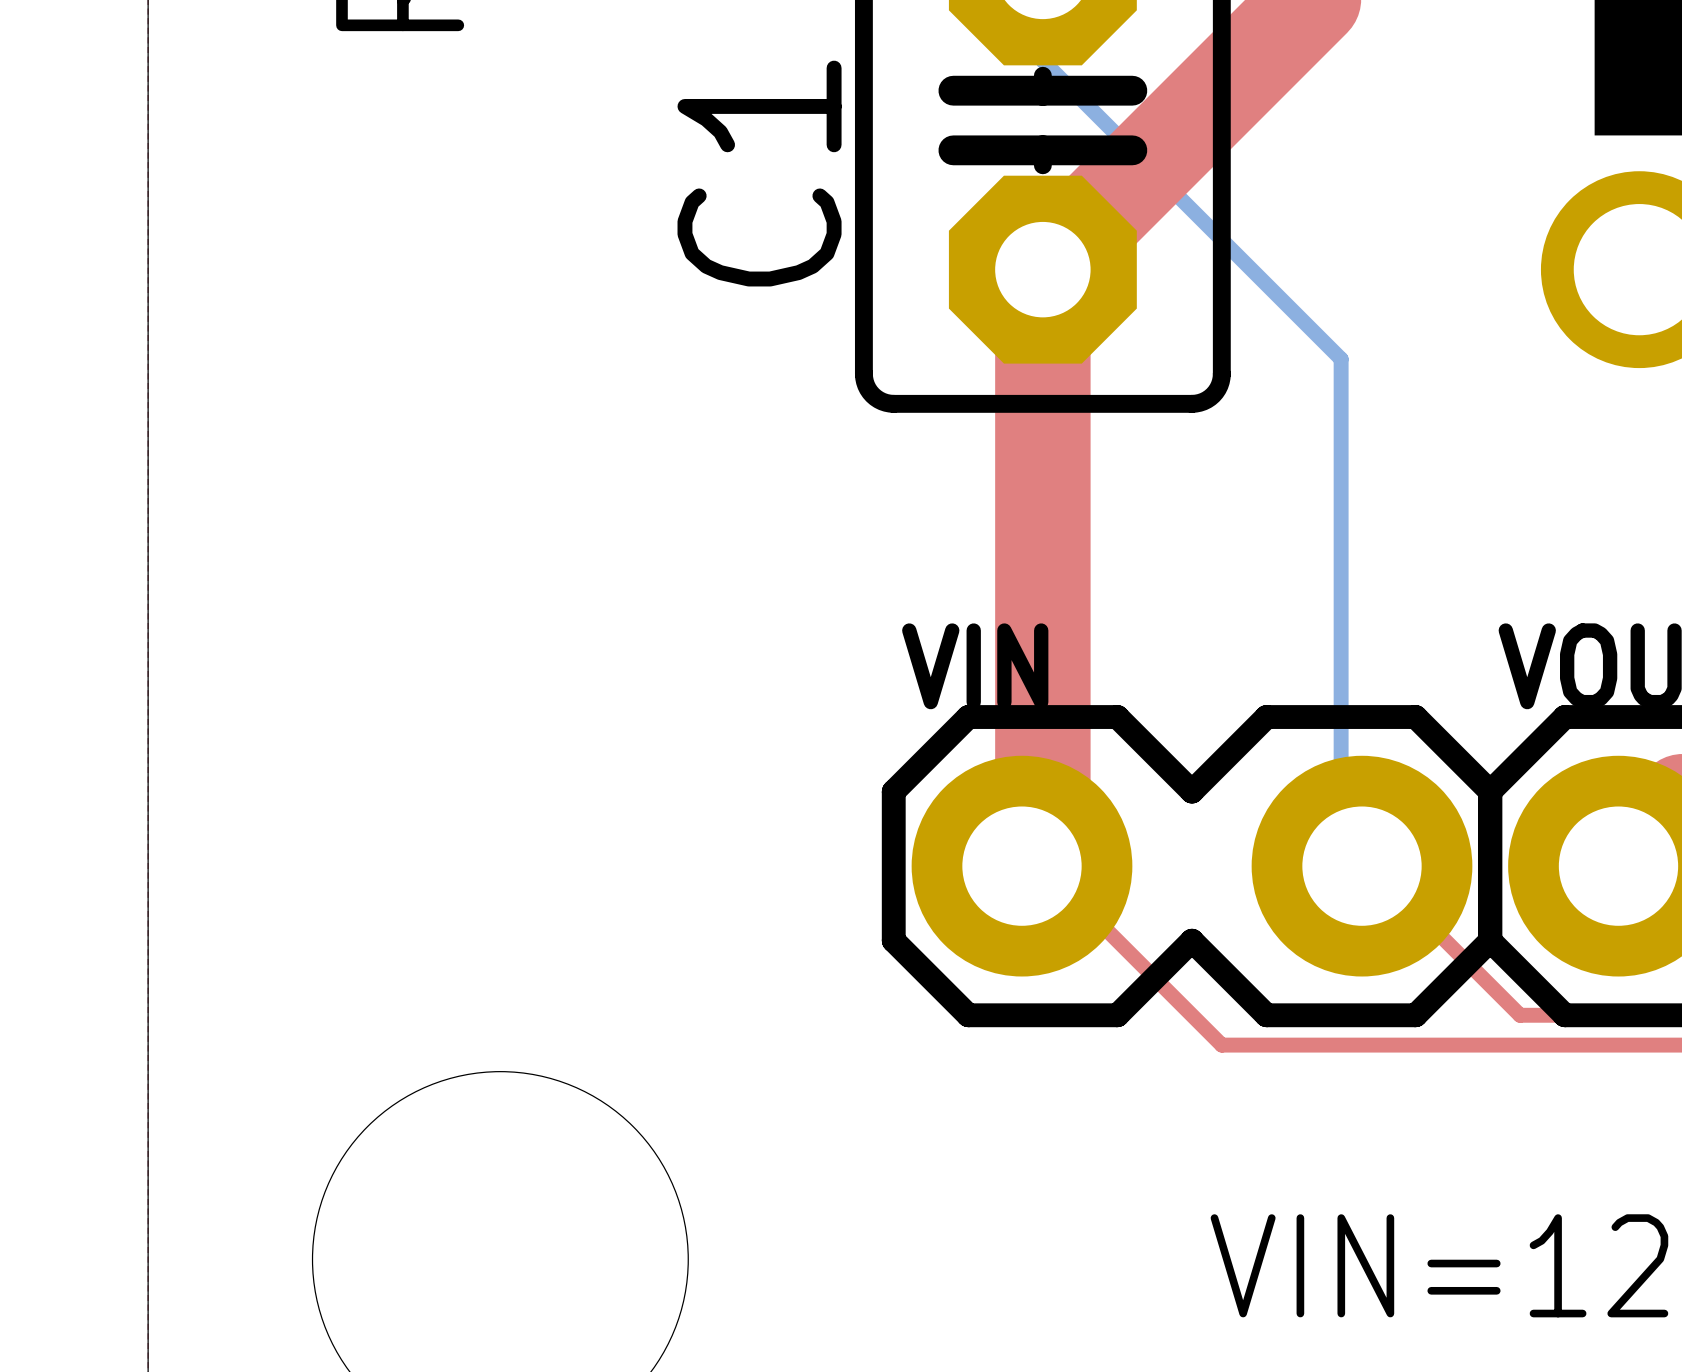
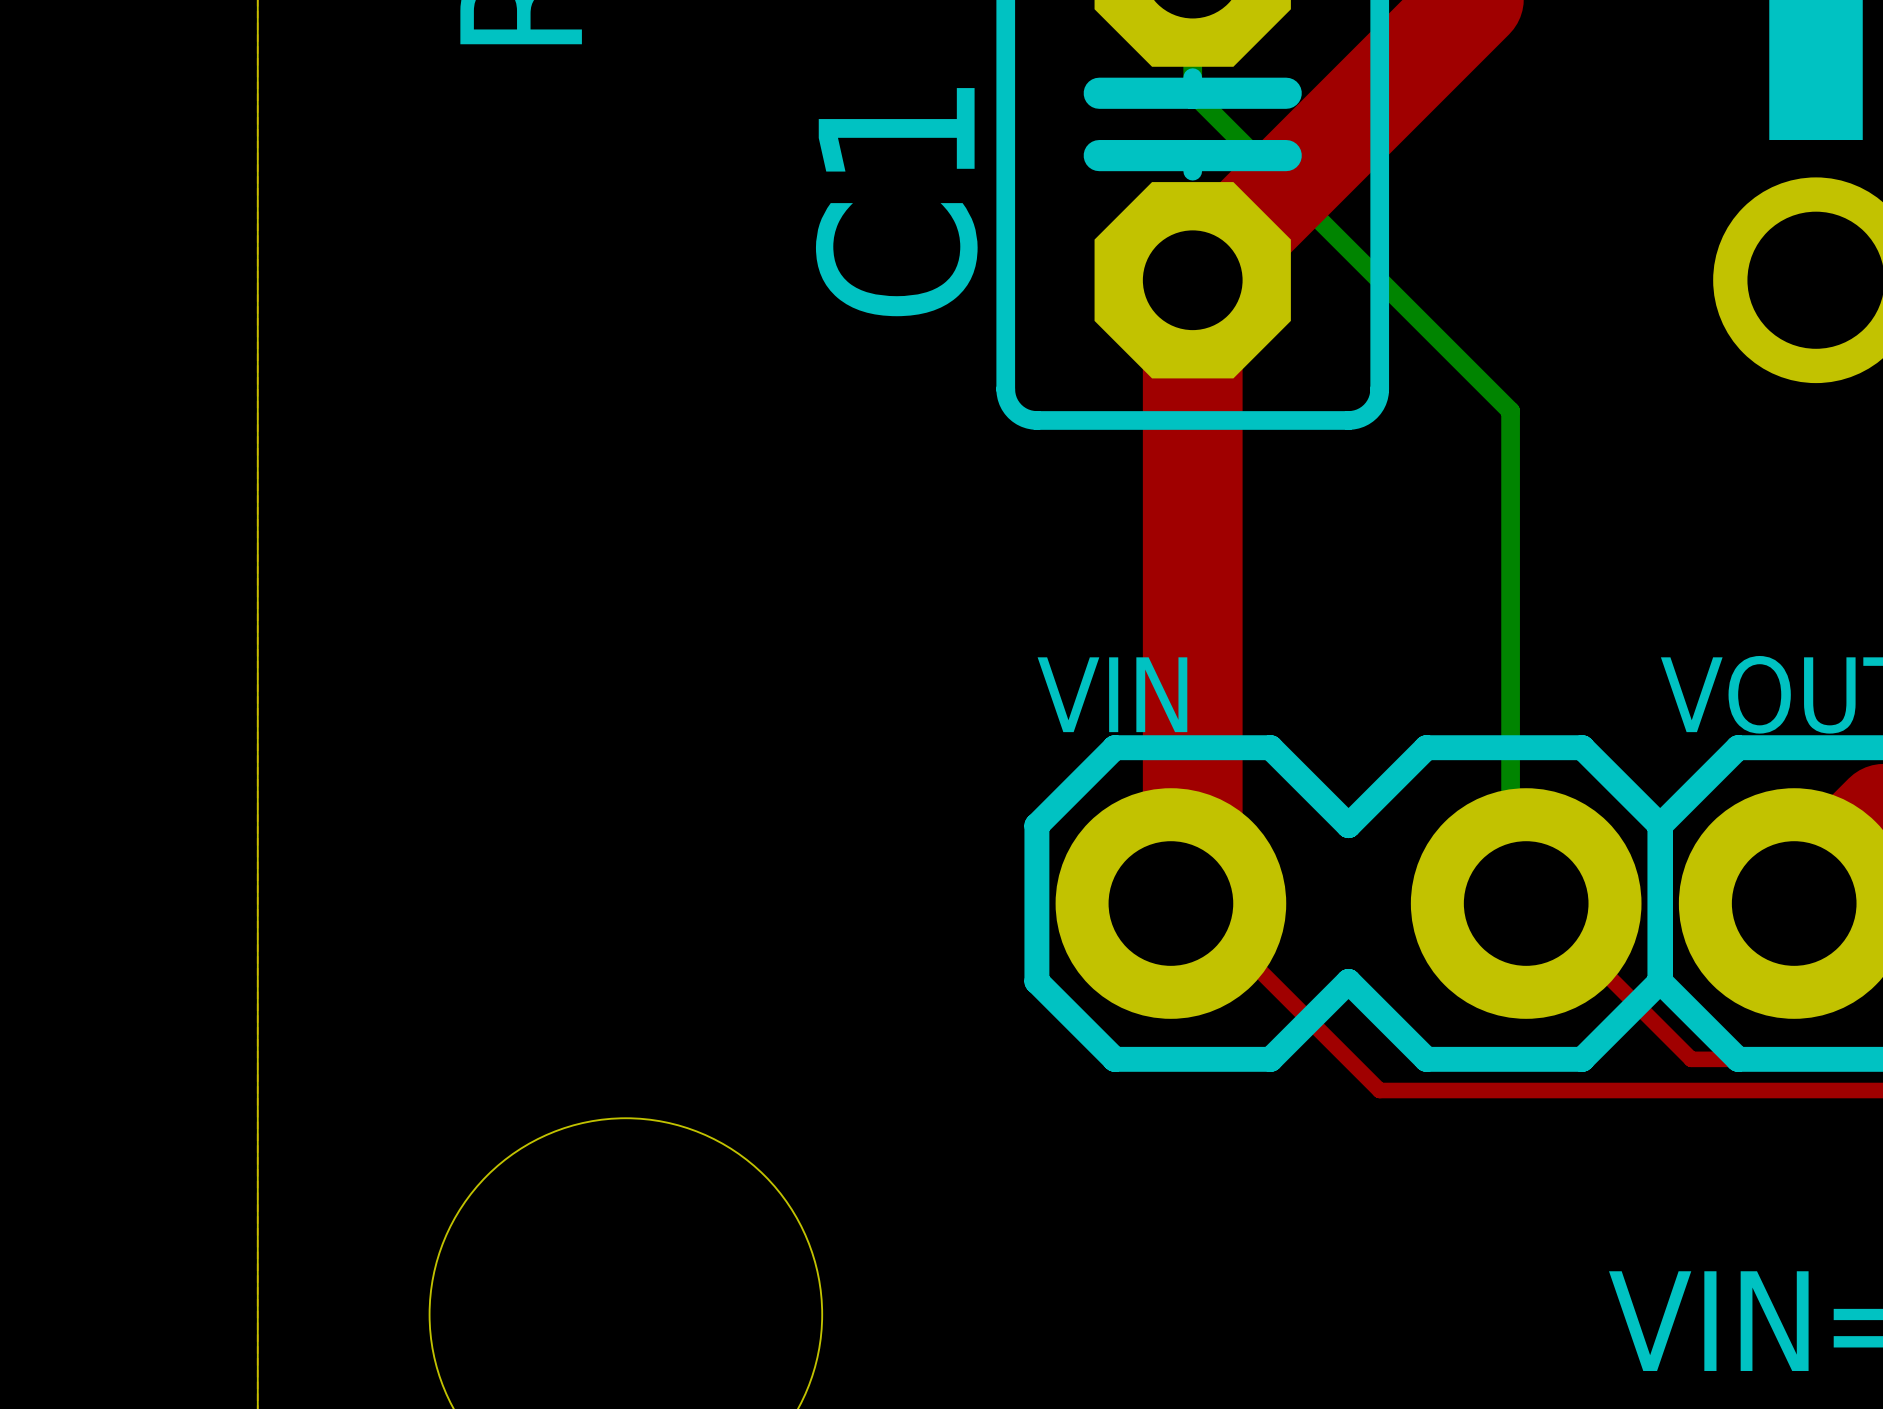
bottom track: (1042, 60) (1341, 359) (1341, 866) (1362, 866) -> (1192, 62) (1192, 93) (1510, 411) (1510, 897) (1526, 903)

